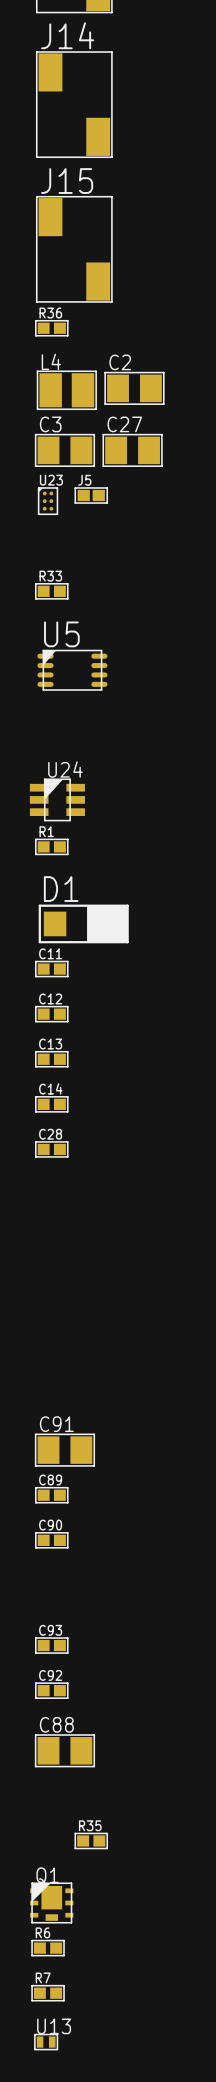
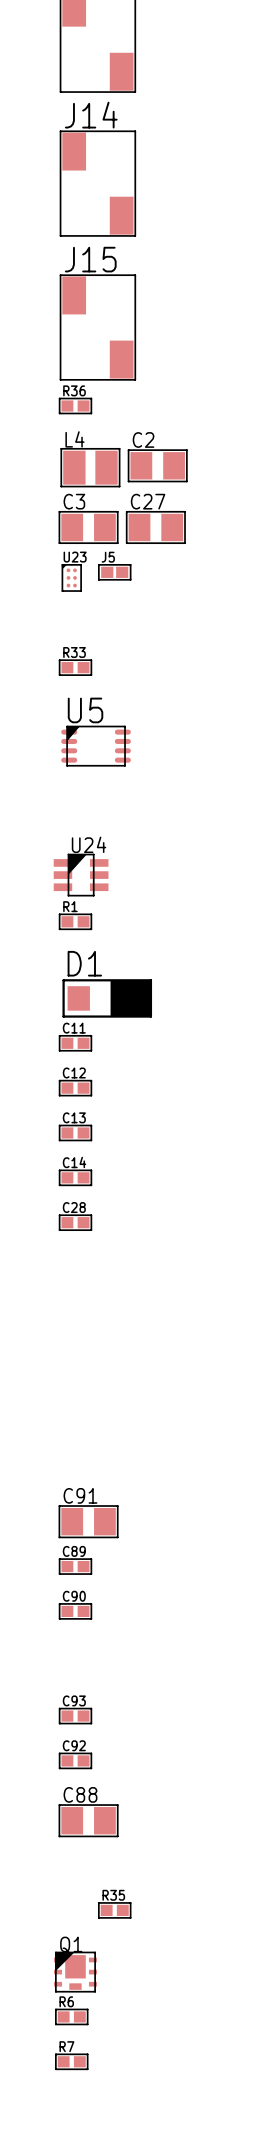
U13: (46, 2042) -> none

